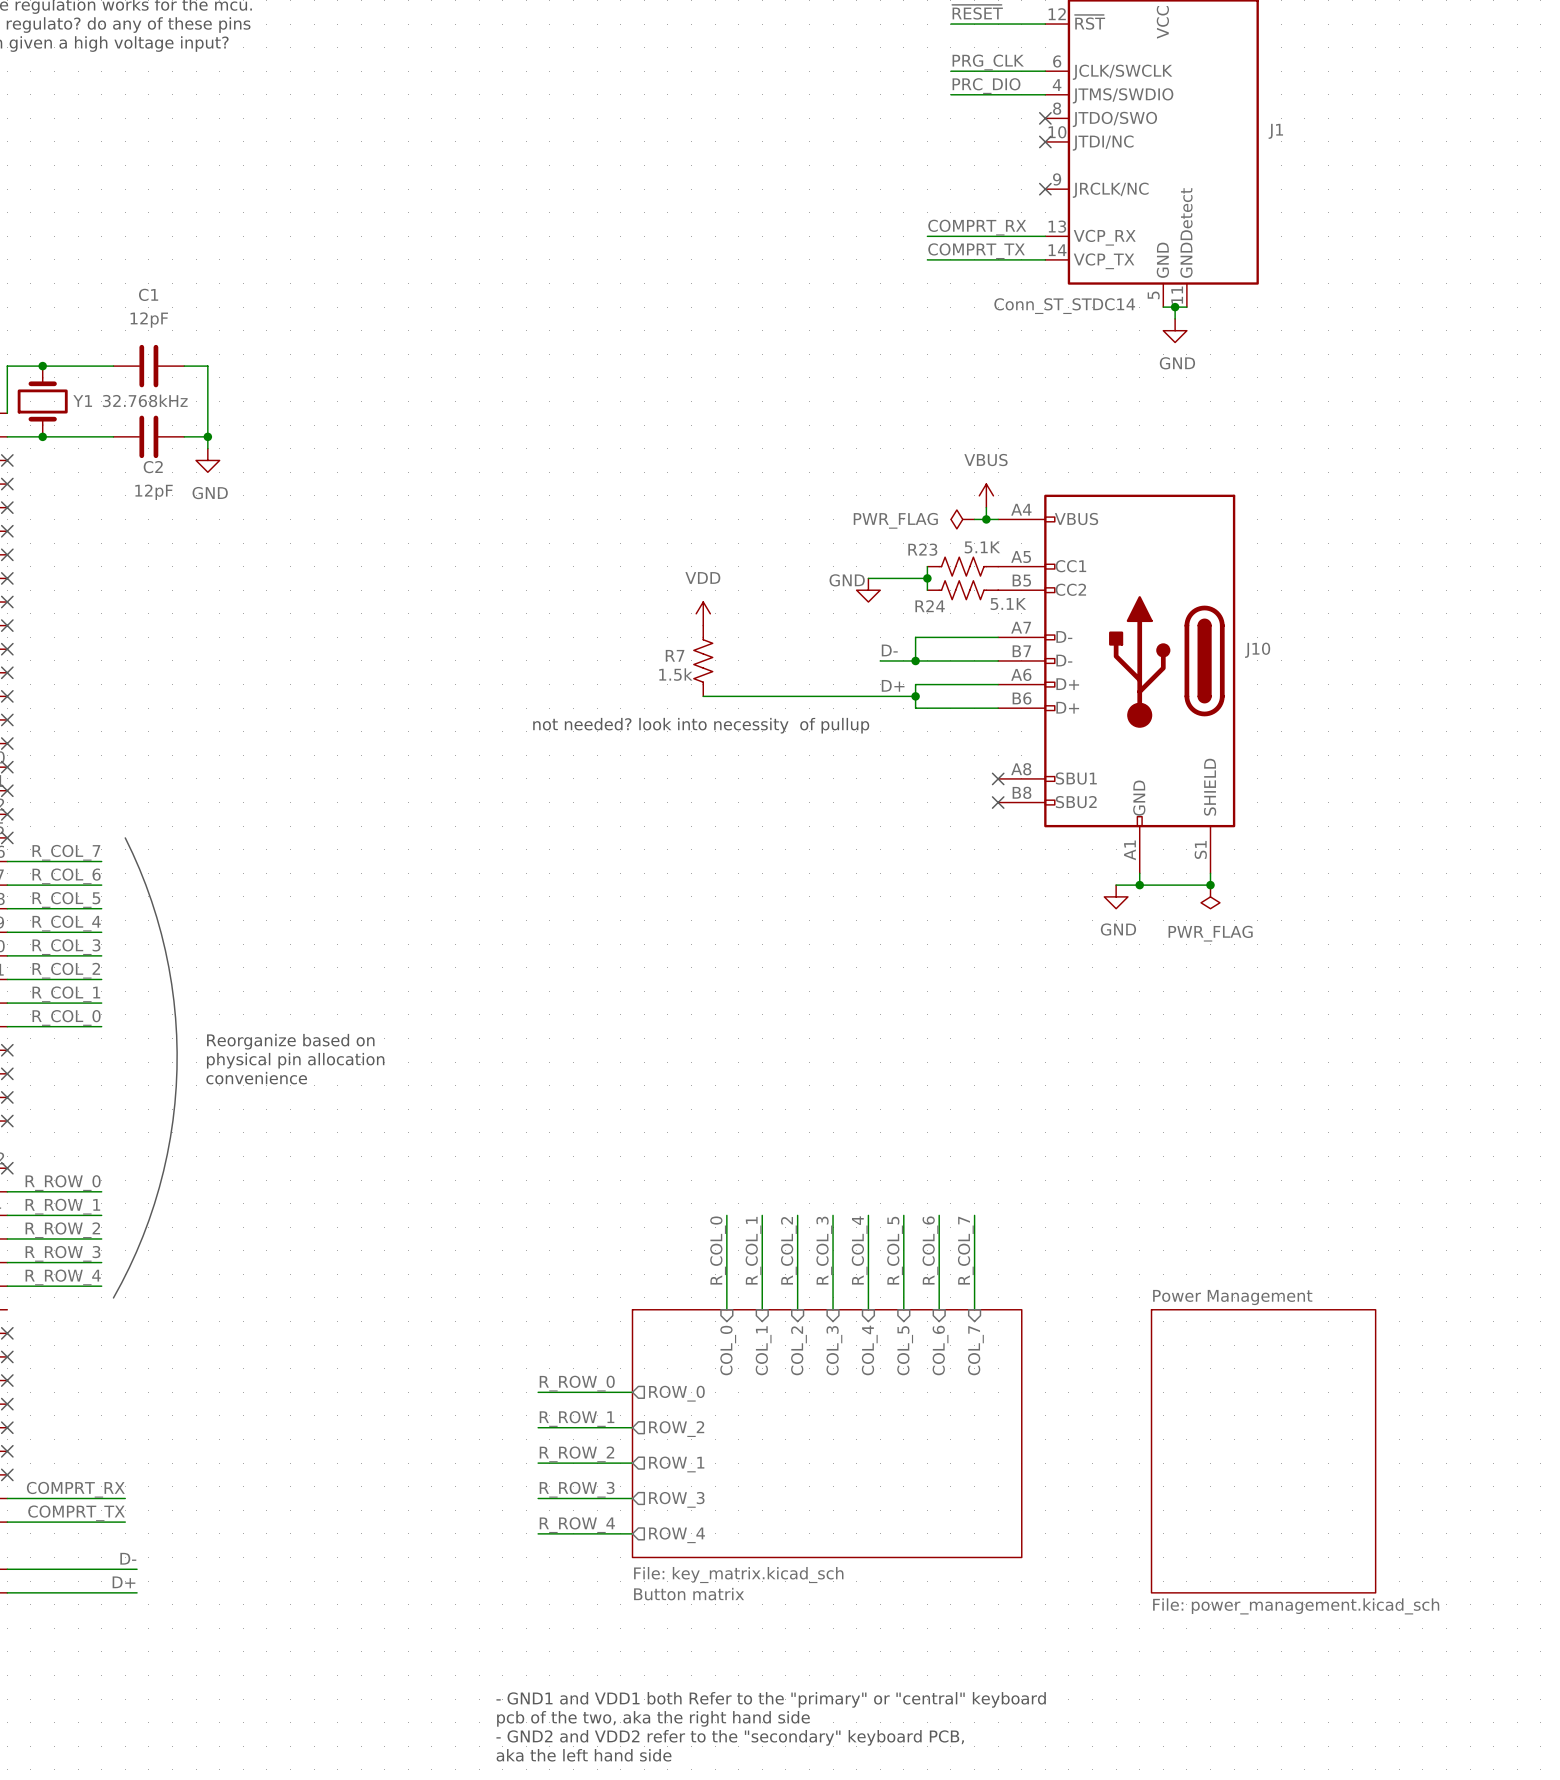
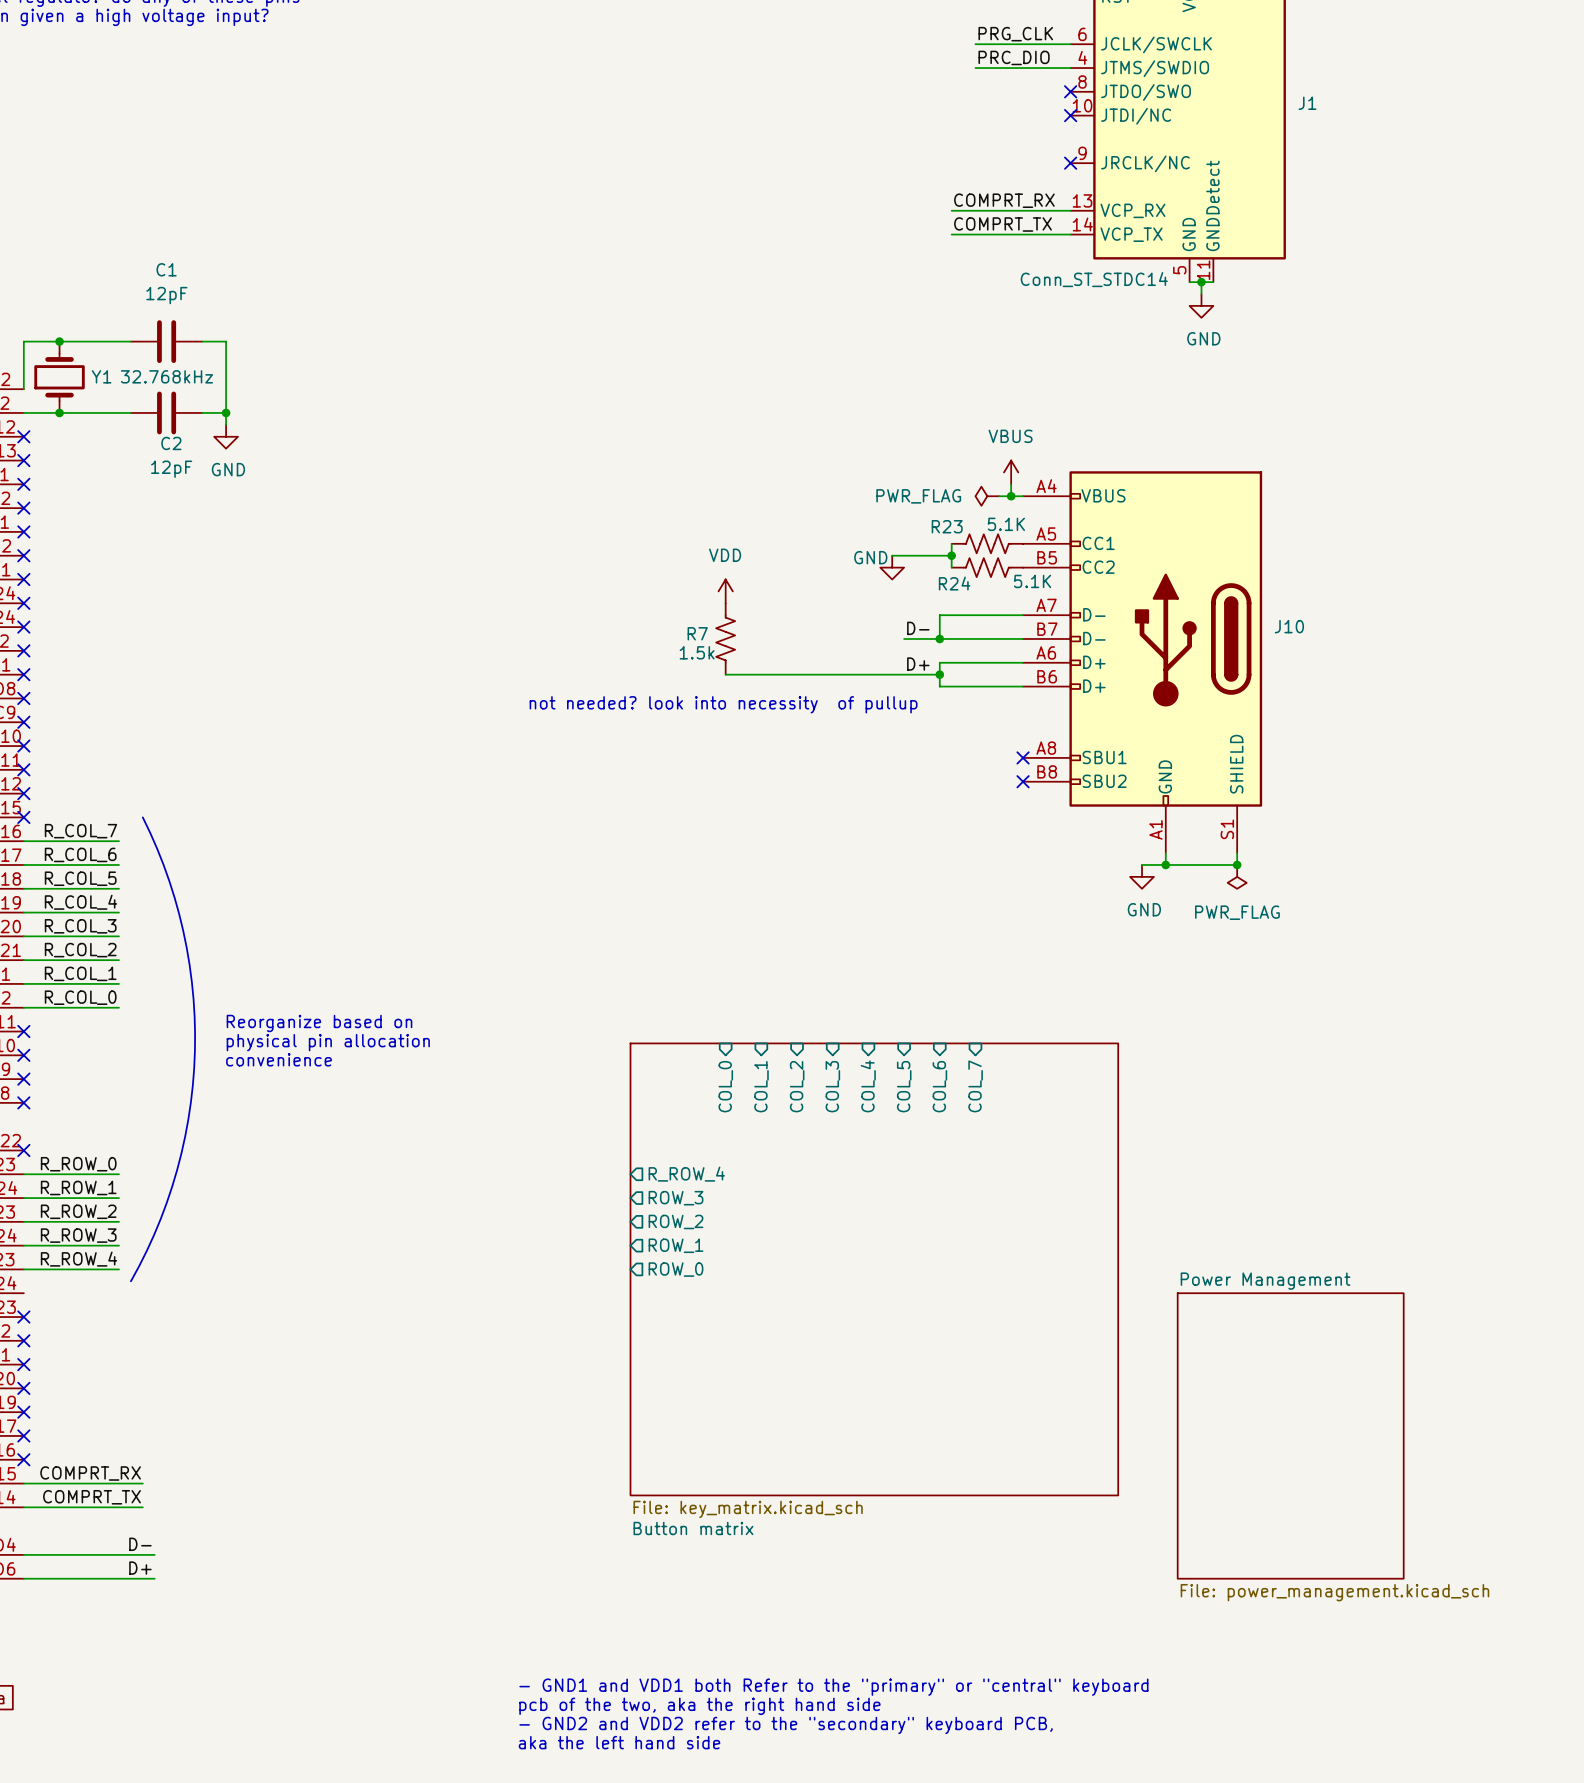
sheet pin: none -> COL_0 (725, 1086)
sheet pin: none -> COL_3 (832, 1086)
sheet pin: none -> COL_4 (868, 1086)
sheet pin: none -> COL_6 (939, 1086)
sheet pin: none -> COL_7 (975, 1086)
sheet pin: none -> COL_1 (761, 1086)
sheet pin: none -> COL_2 (797, 1086)
sheet pin: none -> COL_5 (904, 1086)
sheet pin: none -> R_ROW_4 (686, 1174)
wire: (726, 1215) (726, 1309) -> none
wire: (762, 1215) (762, 1309) -> none
wire: (797, 1215) (797, 1309) -> none
wire: (833, 1215) (833, 1309) -> none
wire: (868, 1215) (868, 1309) -> none
wire: (903, 1215) (903, 1309) -> none
wire: (939, 1215) (939, 1309) -> none
wire: (974, 1215) (974, 1309) -> none
sheet pin: none -> ROW_3 (676, 1198)
label: R_COL_0 (718, 1250) -> none
label: R_COL_1 (753, 1250) -> none
label: R_COL_2 (788, 1250) -> none
label: R_COL_3 (824, 1250) -> none
label: R_COL_4 (859, 1250) -> none
label: R_COL_5 (895, 1250) -> none
label: R_COL_6 (930, 1250) -> none
label: R_COL_7 (965, 1250) -> none
sheet Button matrix: none -> File: key_matrix.kicad_sch (874, 1269)
sheet pin: COL_0 (728, 1350) -> none
sheet pin: COL_1 (763, 1350) -> none
sheet pin: COL_2 (799, 1350) -> none
sheet pin: COL_3 (834, 1350) -> none
sheet pin: COL_4 (869, 1350) -> none
sheet pin: COL_5 (905, 1350) -> none
sheet pin: COL_6 (940, 1350) -> none
sheet pin: COL_7 (975, 1350) -> none
label: R_ROW_0 (577, 1383) -> none
wire: (538, 1392) (632, 1392) -> none
sheet pin position: ROW_0 (676, 1393) -> ROW_0 (676, 1269)
label: R_ROW_1 (577, 1418) -> none
wire: (538, 1427) (632, 1427) -> none
sheet pin position: ROW_2 (676, 1429) -> ROW_2 (676, 1221)
sheet Button matrix: File: key_matrix.kicad_sch (827, 1433) -> none
label: R_ROW_2 (576, 1454) -> none
wire: (538, 1463) (632, 1463) -> none
sheet pin position: ROW_1 (676, 1464) -> ROW_1 (676, 1245)
label: R_ROW_3 (577, 1489) -> none
wire: (538, 1498) (632, 1498) -> none
sheet pin: ROW_3 (676, 1499) -> none
label: R_ROW_4 (577, 1525) -> none
wire: (538, 1533) (632, 1533) -> none
sheet pin: ROW_4 (676, 1535) -> none

